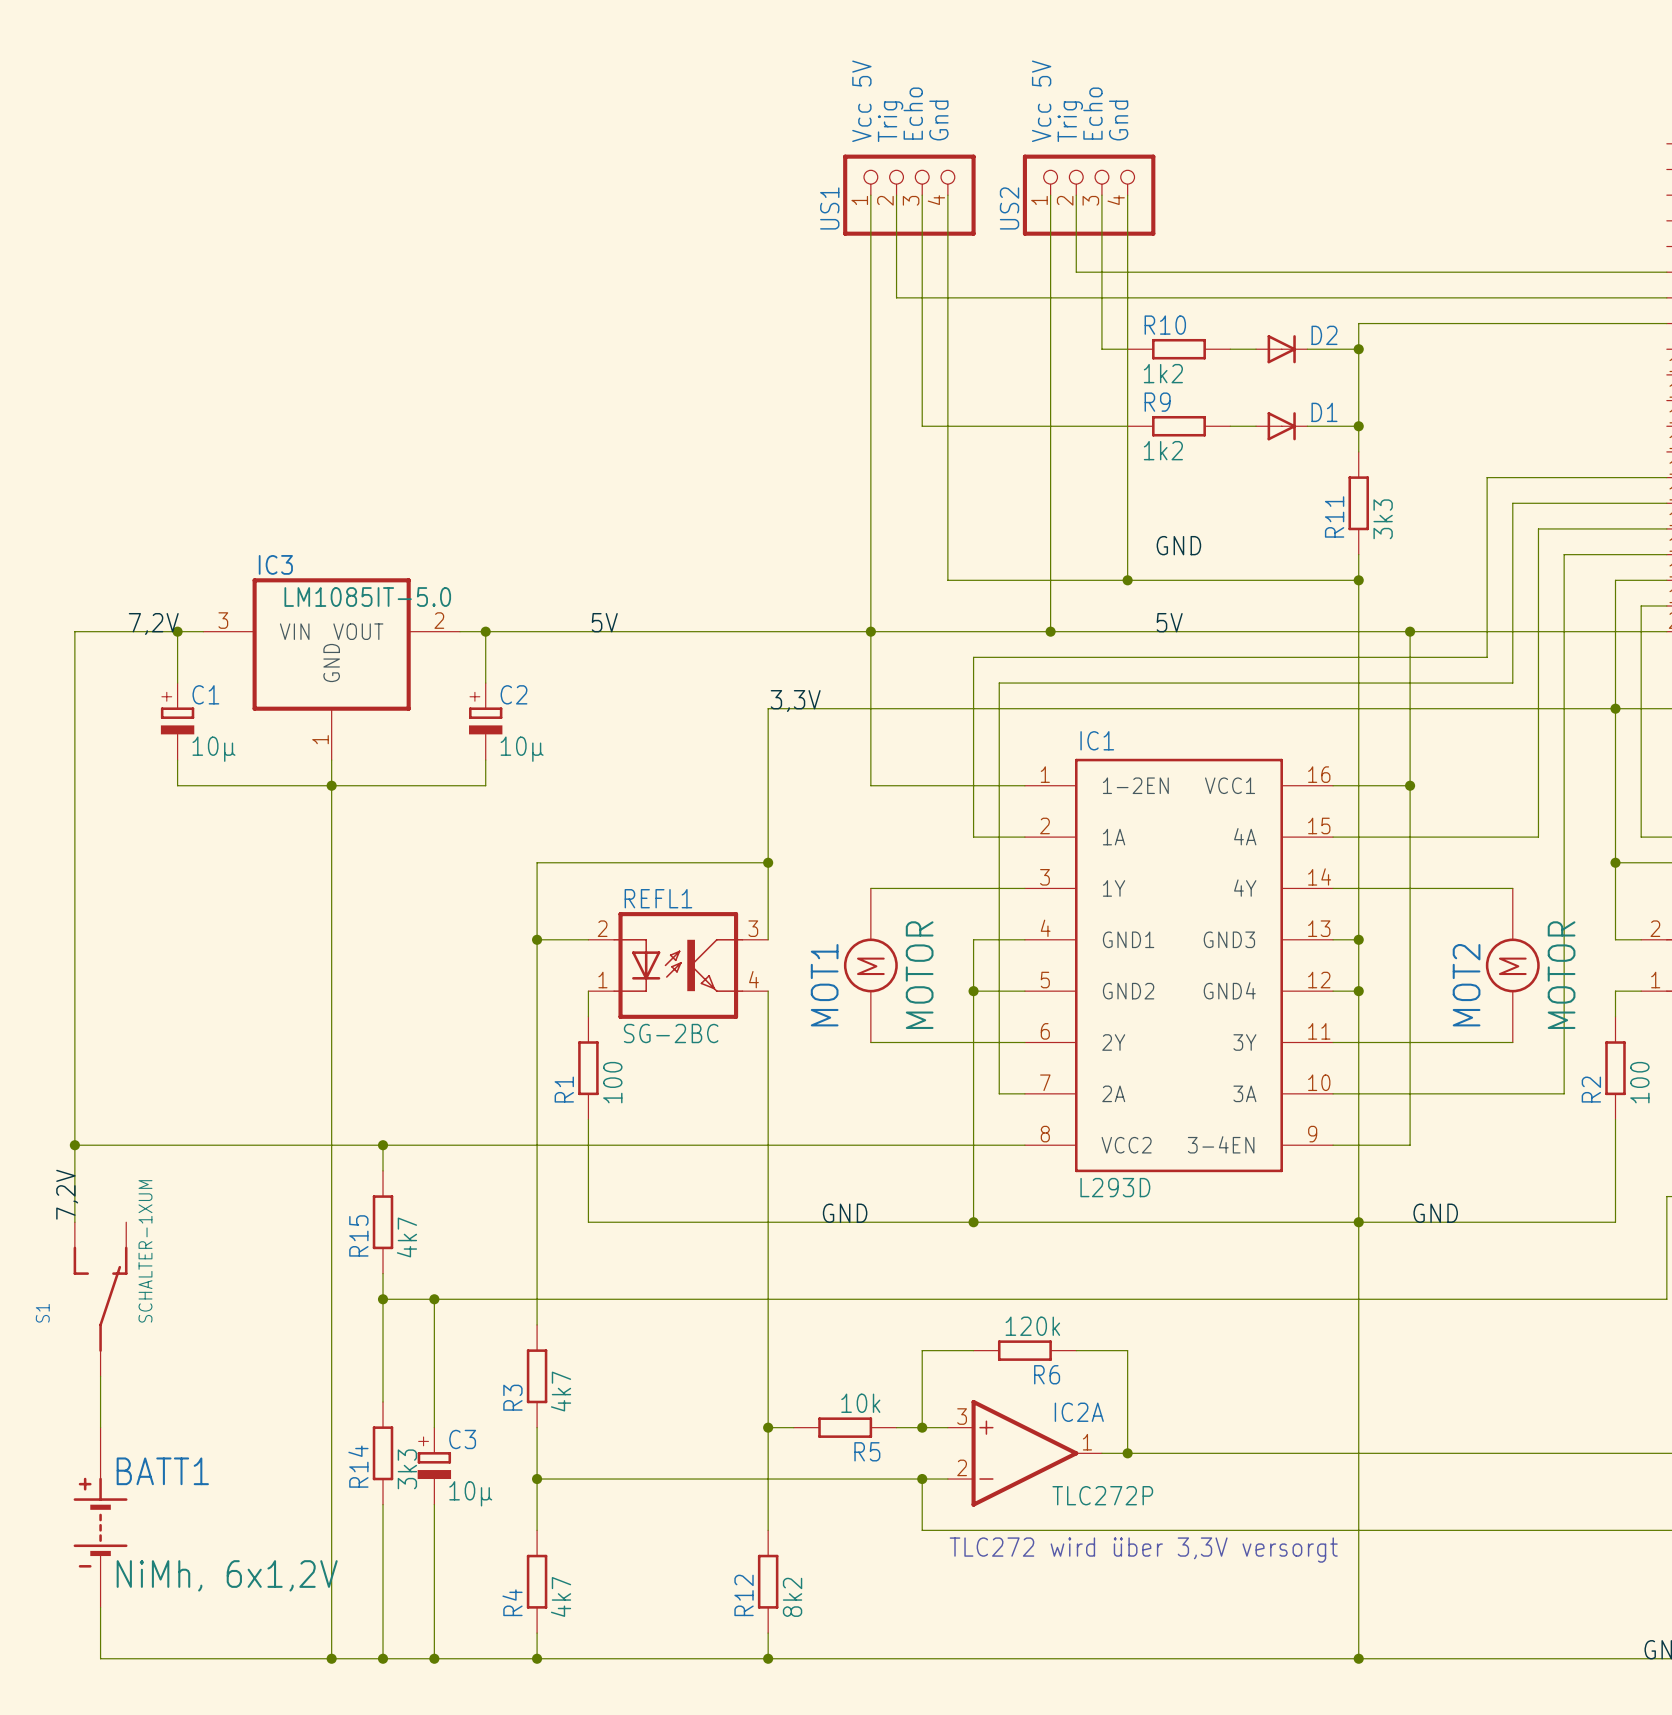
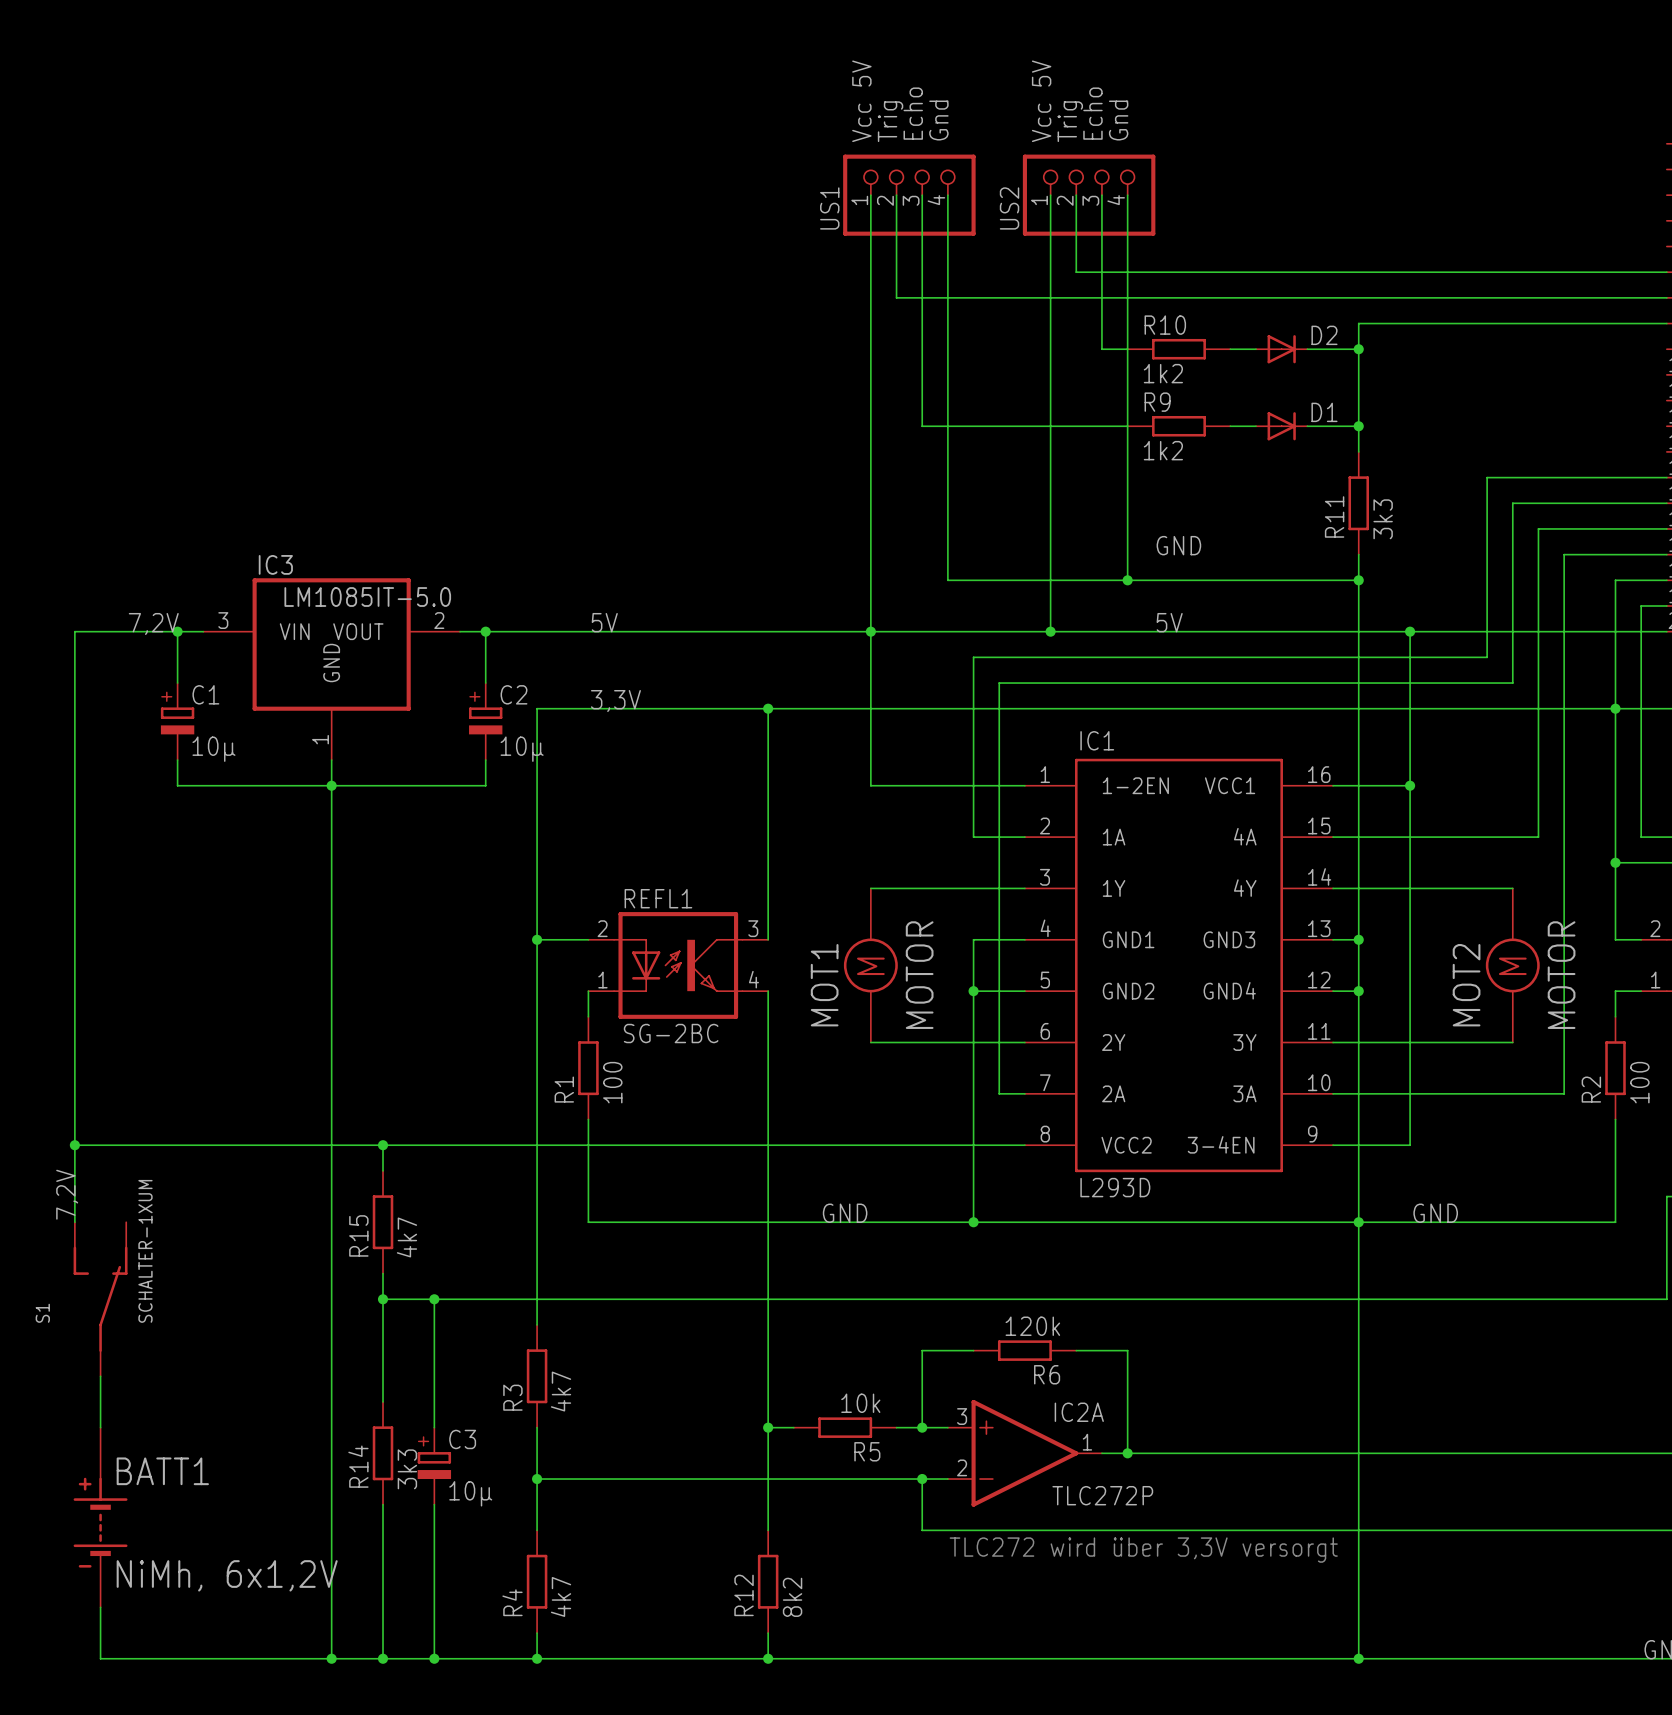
label position: 3,3V (795, 701) -> 3,3V (615, 701)
junction: none -> (768, 708)
wire: (537, 862) (768, 862) -> (537, 862) (537, 708) (768, 708)
junction: (768, 862) -> none

